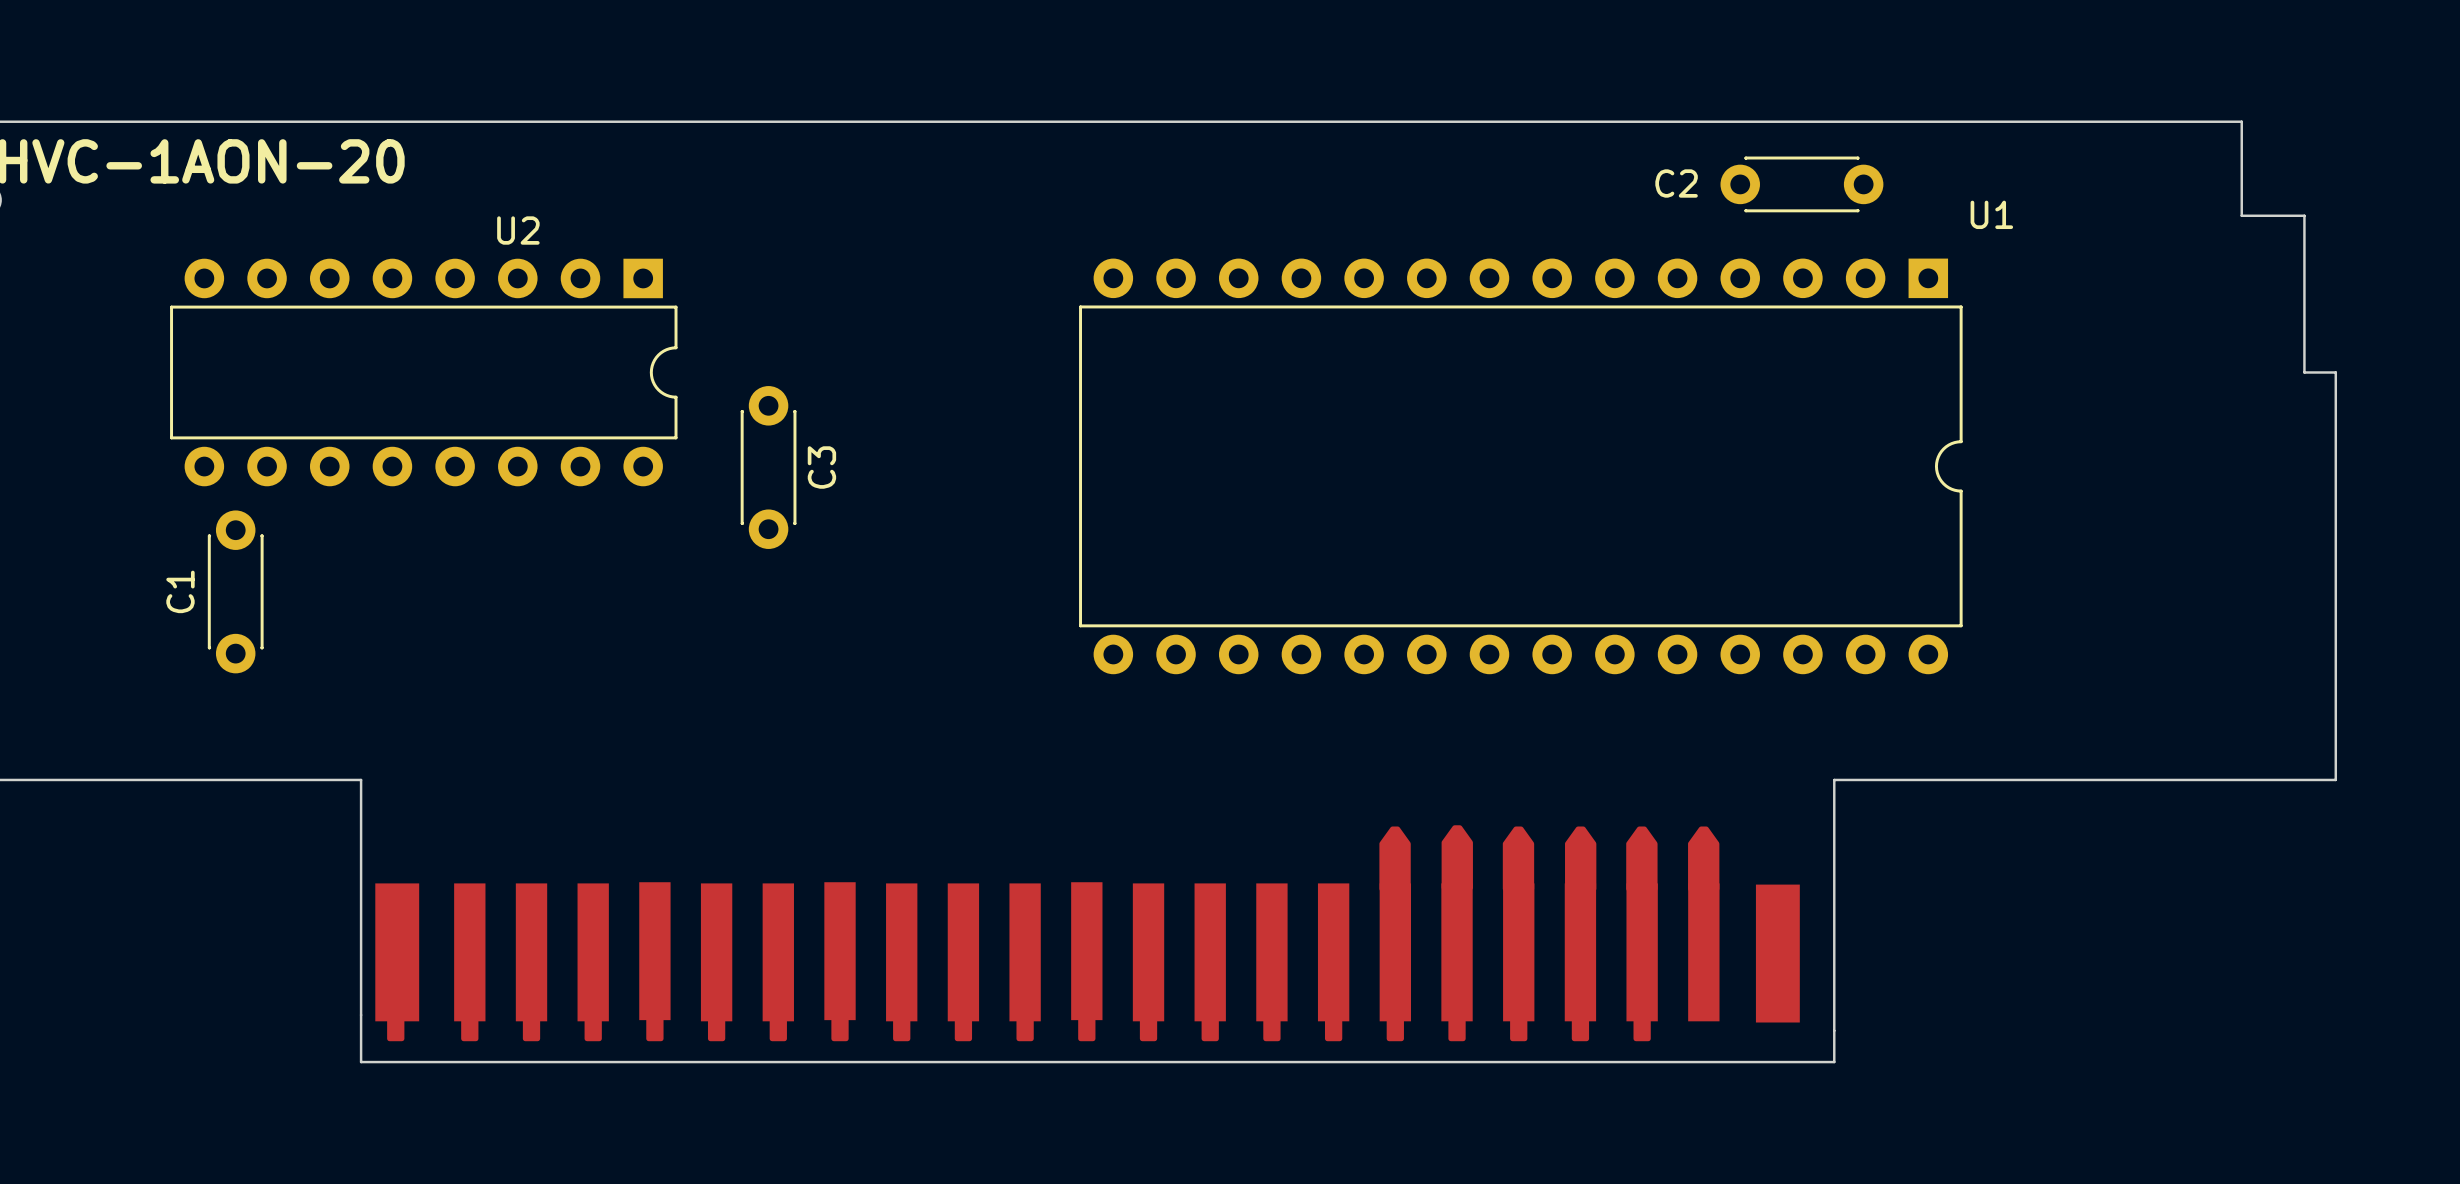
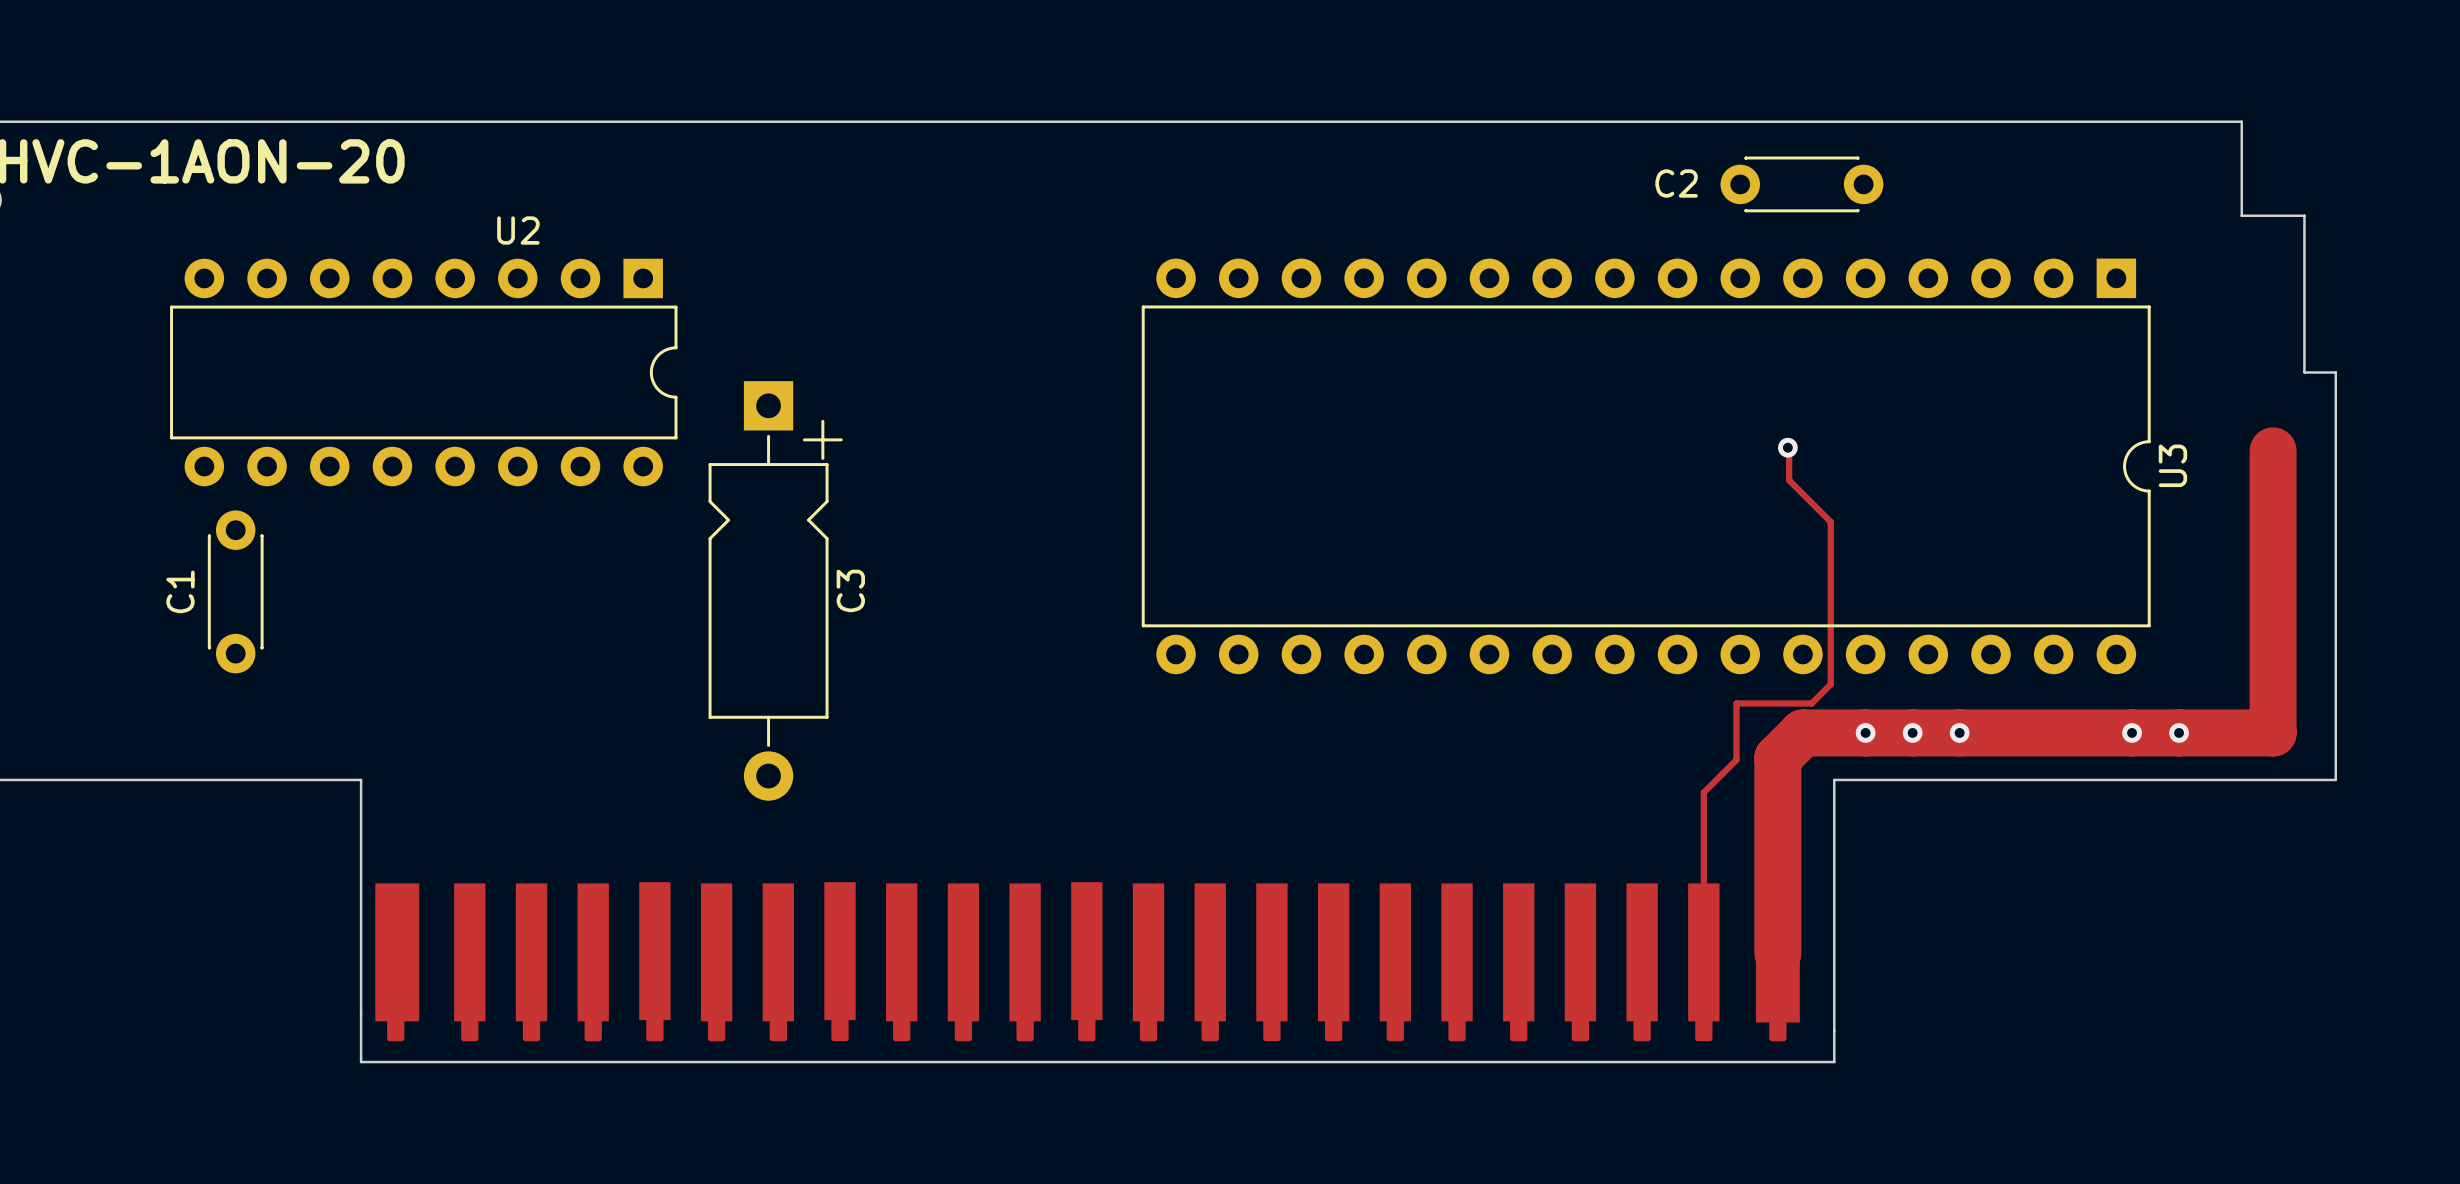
C3 footprint: [740, 386, 797, 549] -> [708, 381, 843, 801]
track: none -> (1787, 447) (1789, 480) (1830, 521) (1830, 684) (1811, 703) (1736, 703) (1736, 759) (1703, 792) (1703, 952)
via: none -> (1787, 447)
track: none -> (2273, 450) (2273, 732) (1802, 732) (1777, 758) (1777, 953)
U1: (1520, 466) -> none
U3: none -> (1646, 466)
via: none -> (1865, 732)
via: none -> (1912, 732)
via: none -> (1959, 732)
via: none -> (2132, 732)
via: none -> (2179, 732)
part: (1087, 933) -> none
part: none -> (1087, 961)

